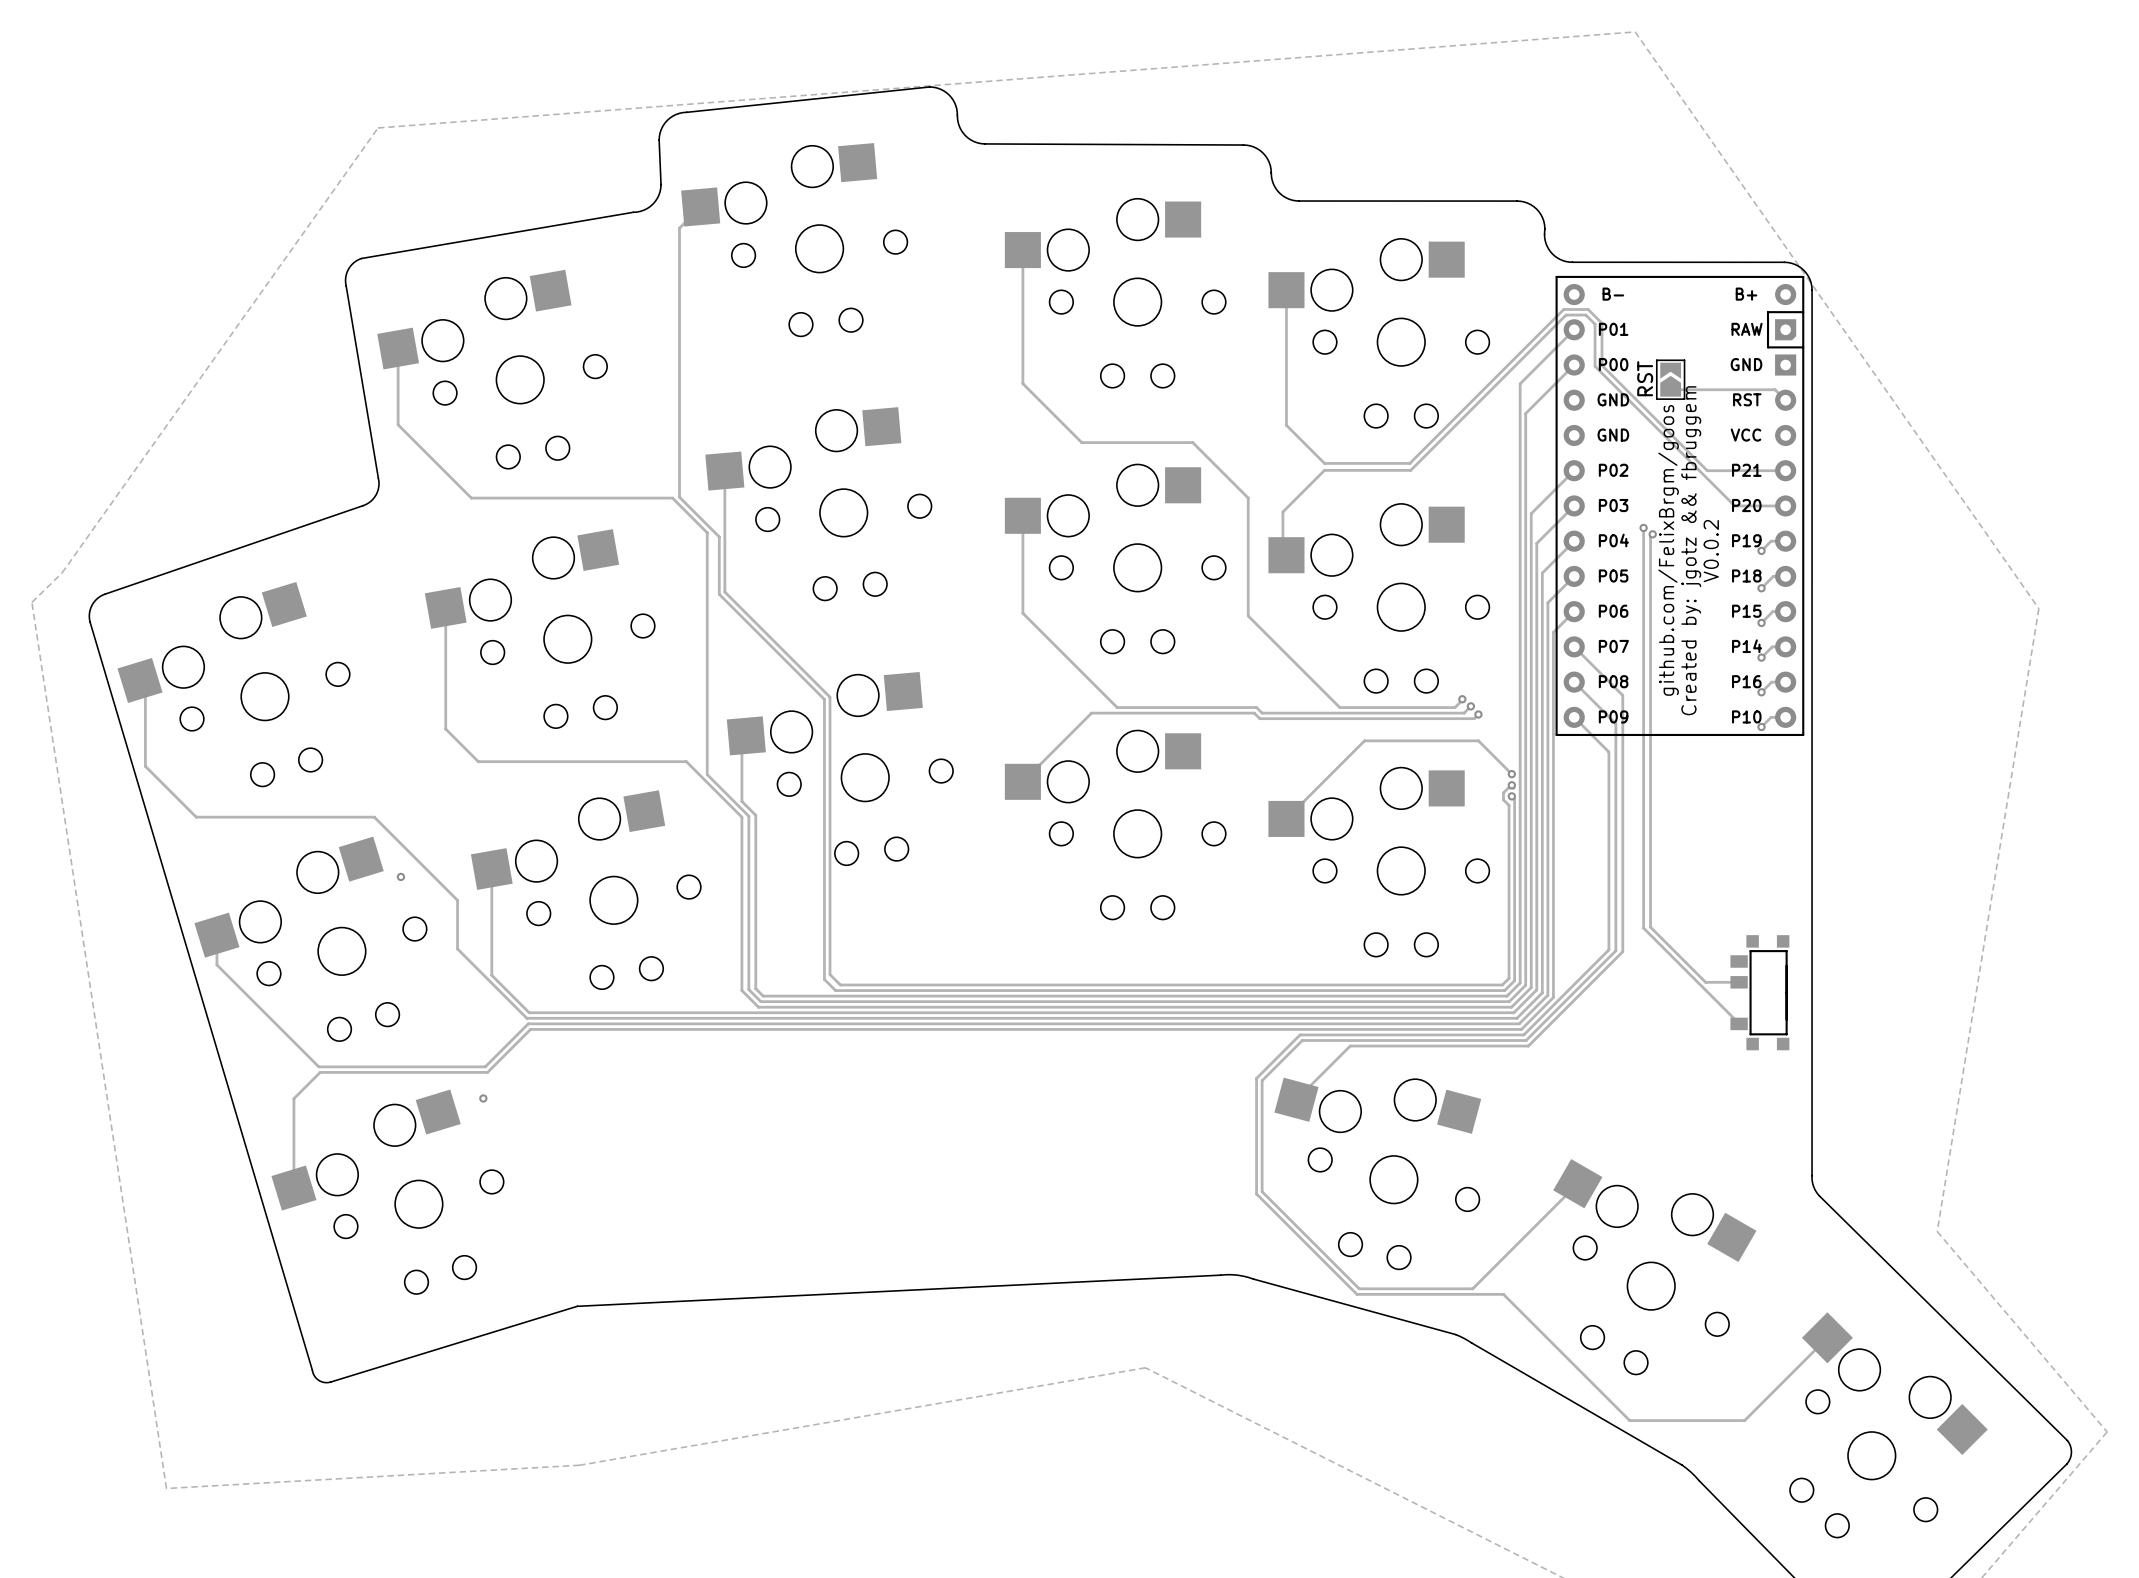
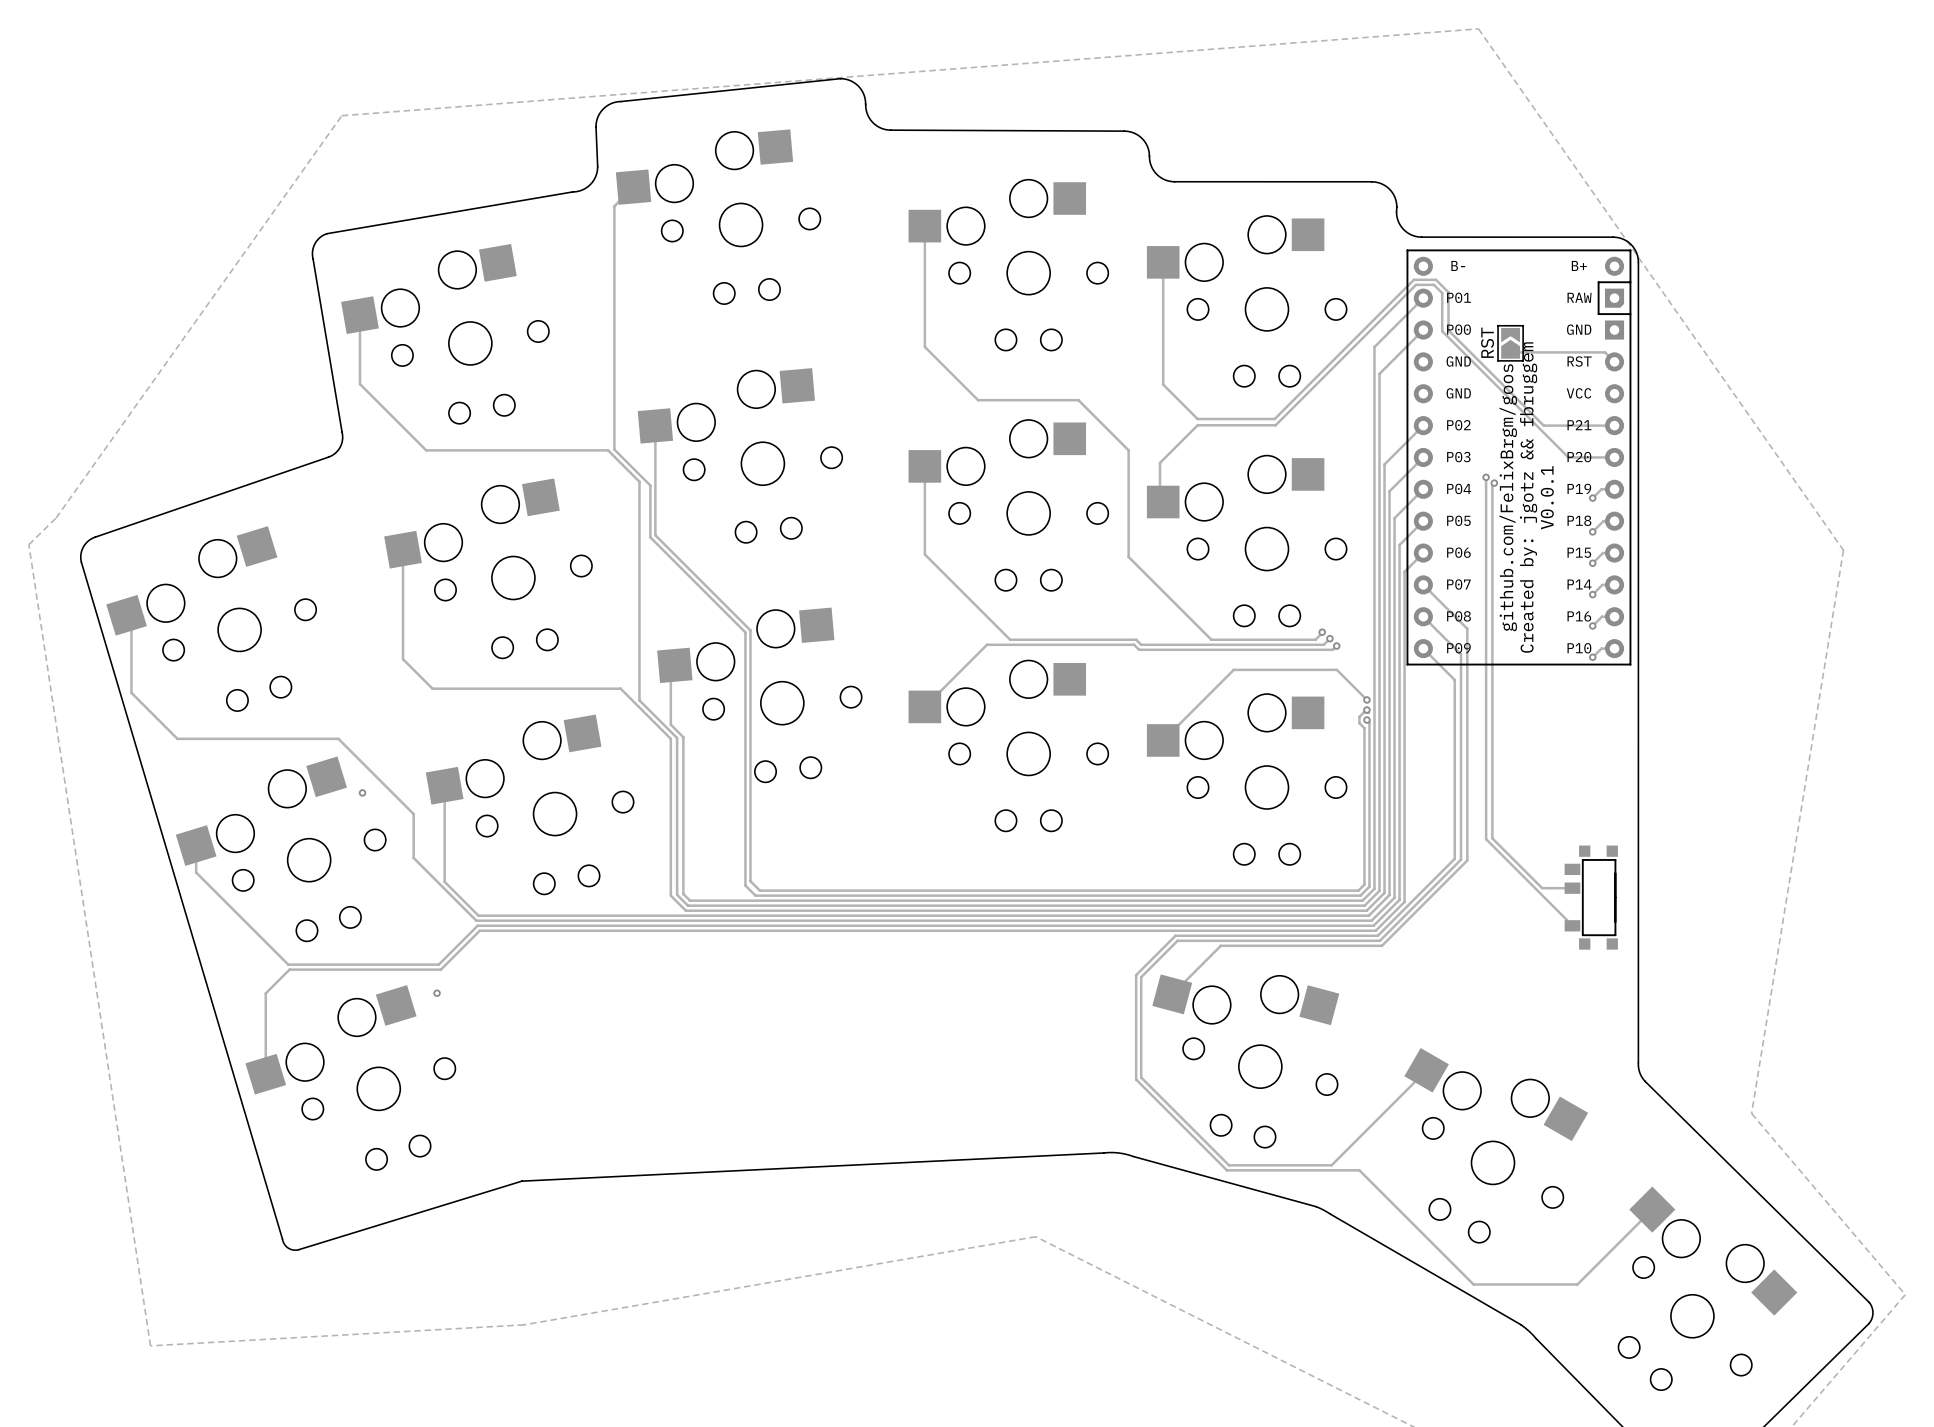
text: V0.0.2 (1711, 551) -> V0.0.1 (1547, 497)

